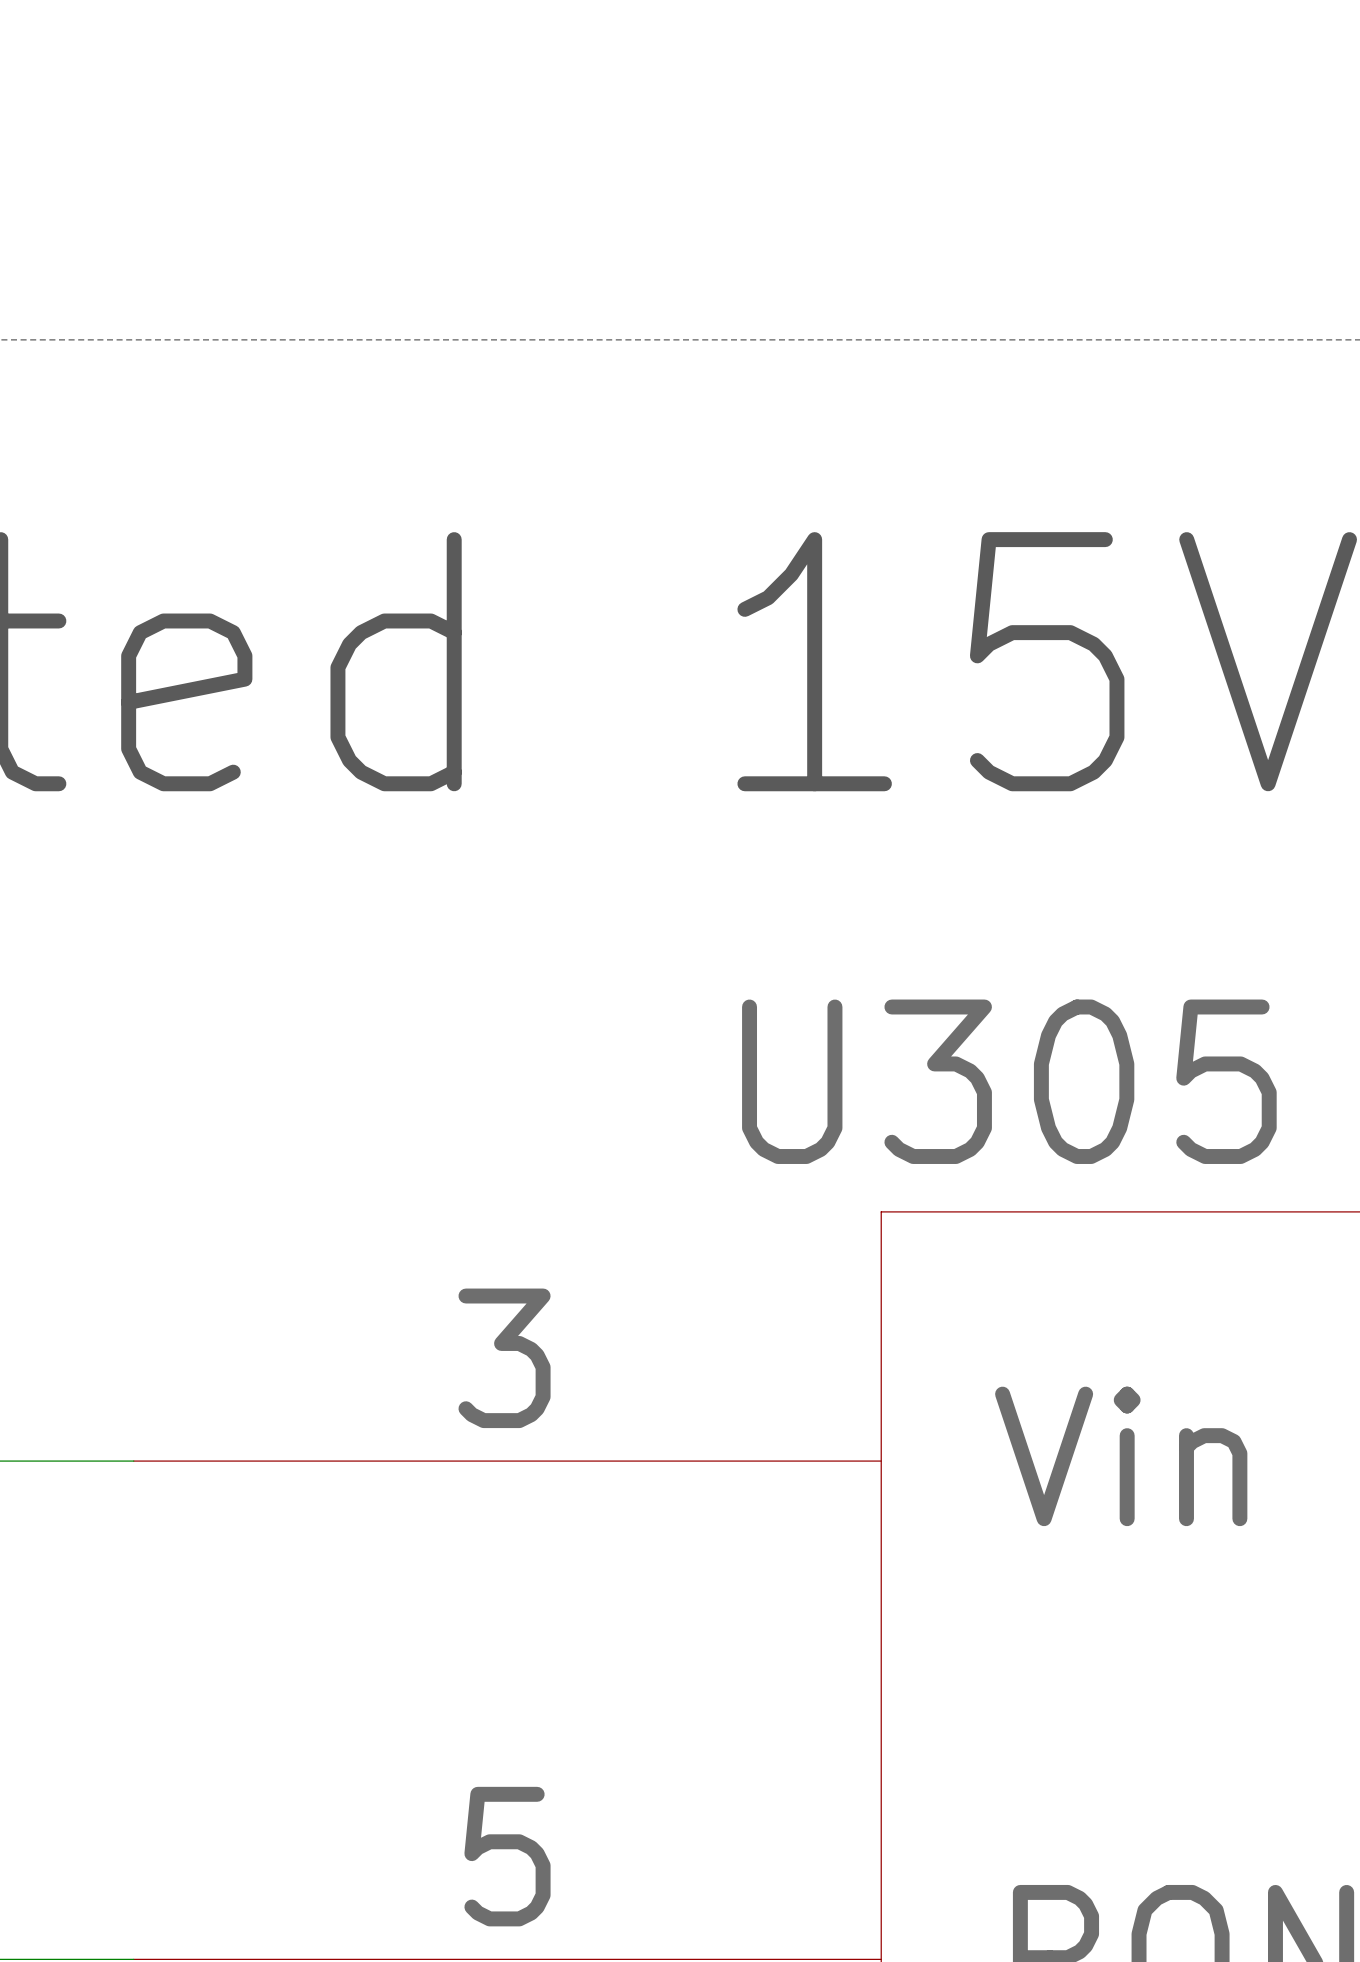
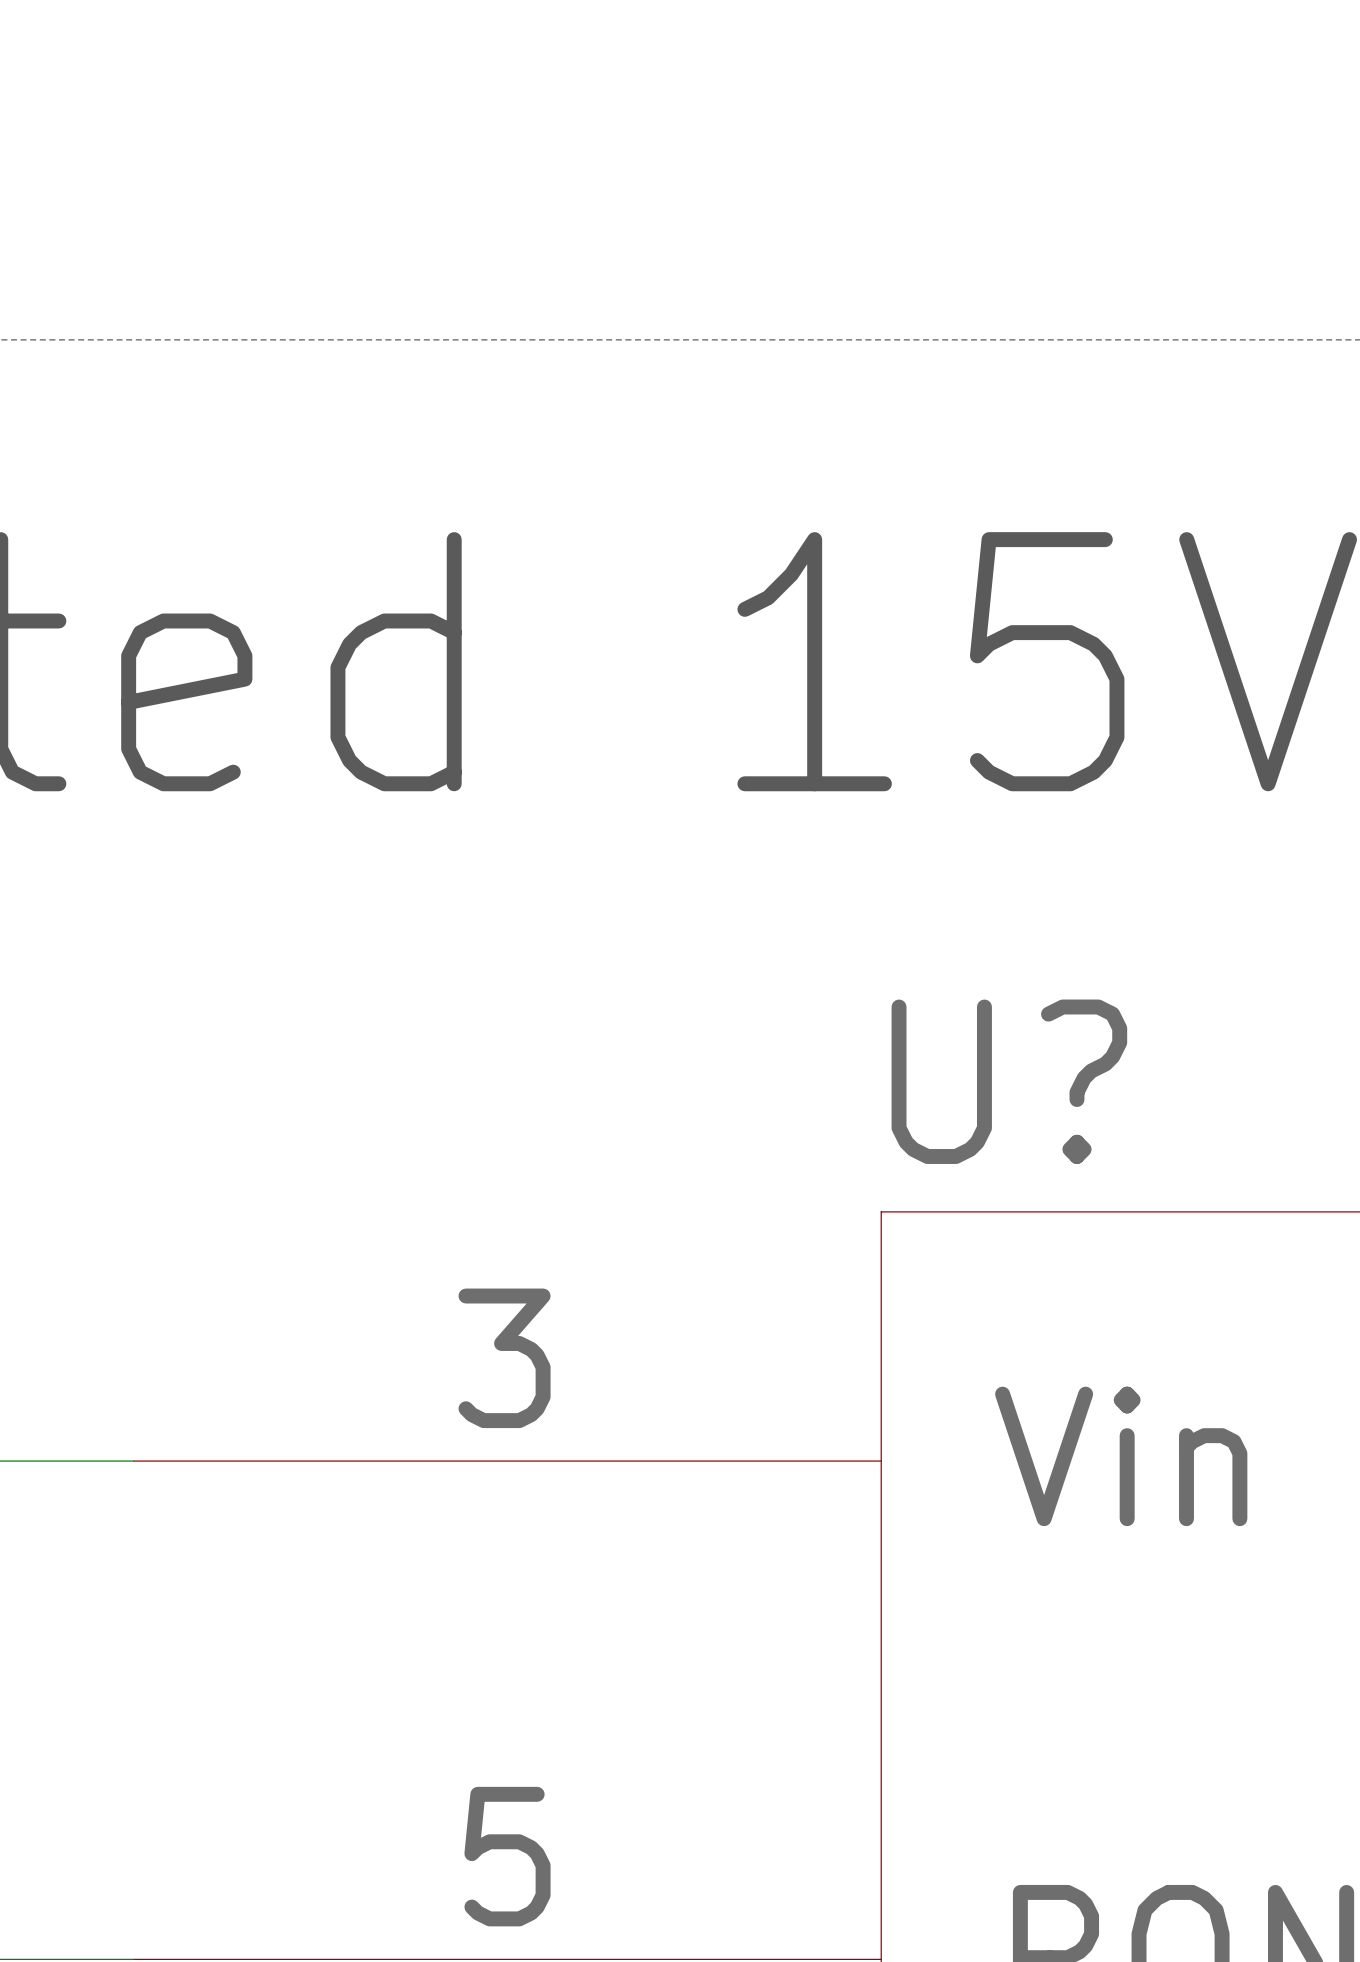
U305 name: U305 (1009, 1081) -> U? (1009, 1081)

